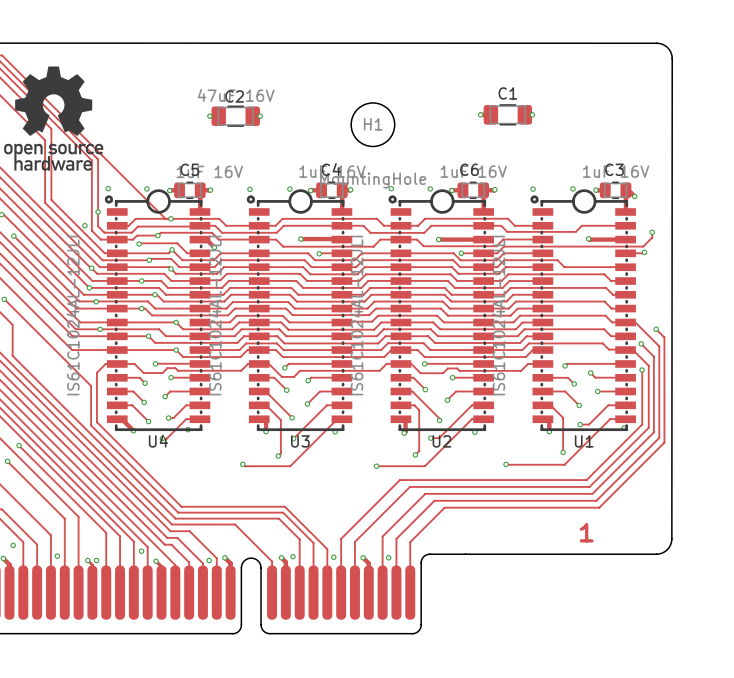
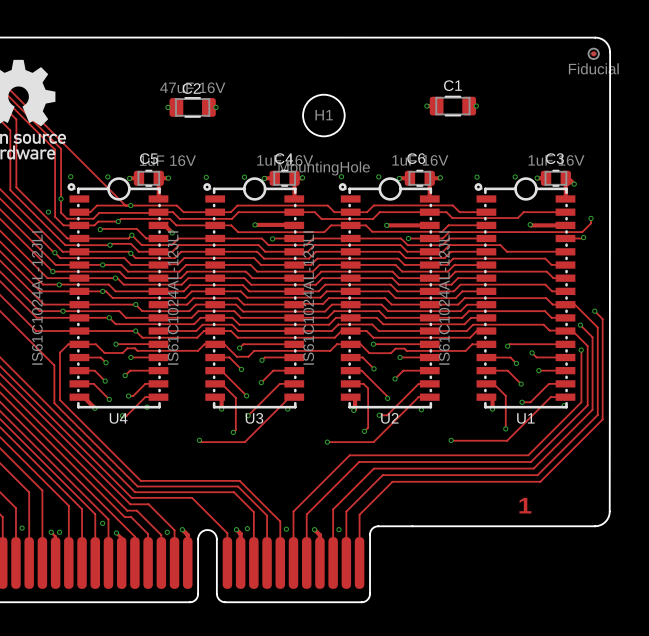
part: none -> Fiducial (593, 53)

